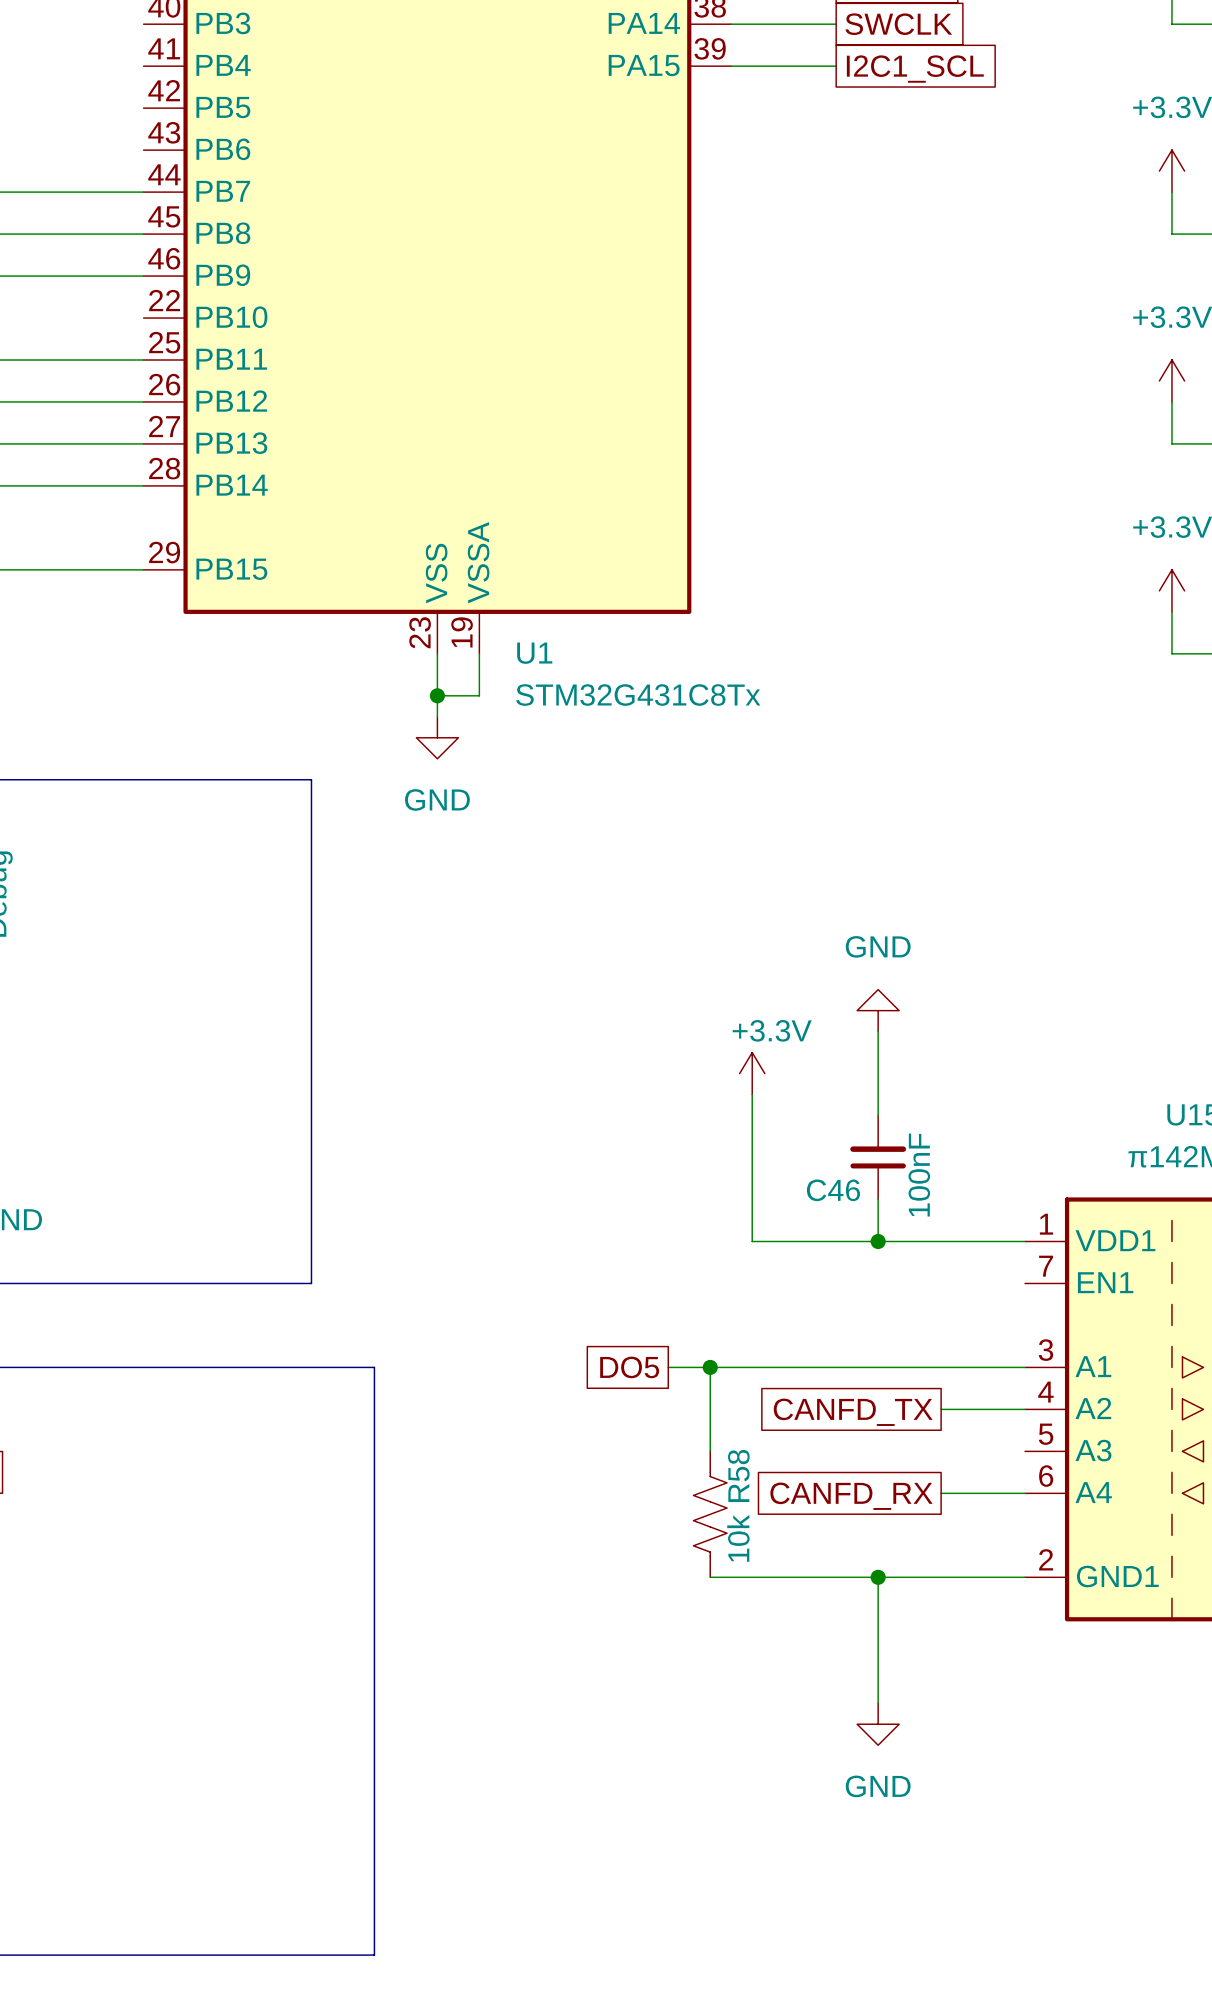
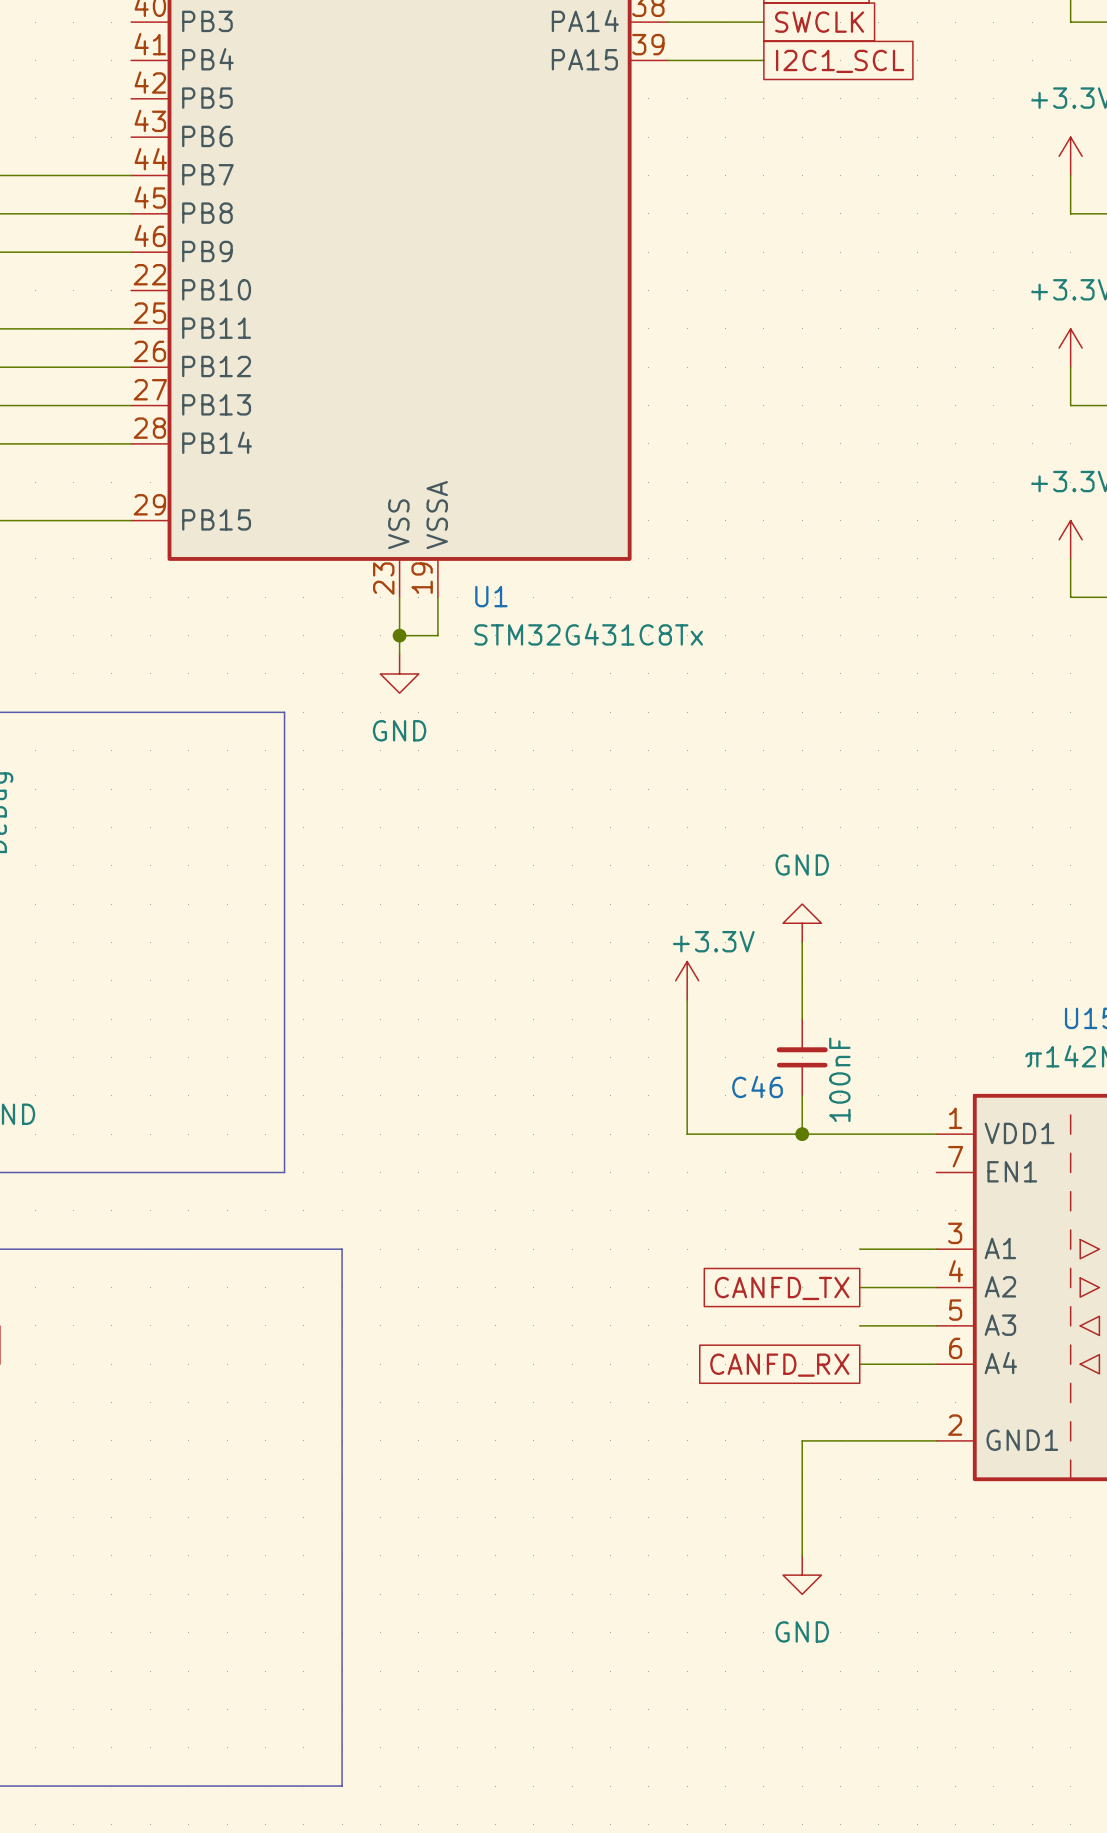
global label: DO5 (629, 1367) -> none
wire: (668, 1367) (941, 1367) -> none
wire: (710, 1367) (710, 1451) -> none
junction: (710, 1367) -> none
wire: none -> (859, 1325) (936, 1325)
R58: 10k (710, 1514) -> none
wire: (710, 1577) (878, 1577) -> none
junction: (878, 1577) -> none

